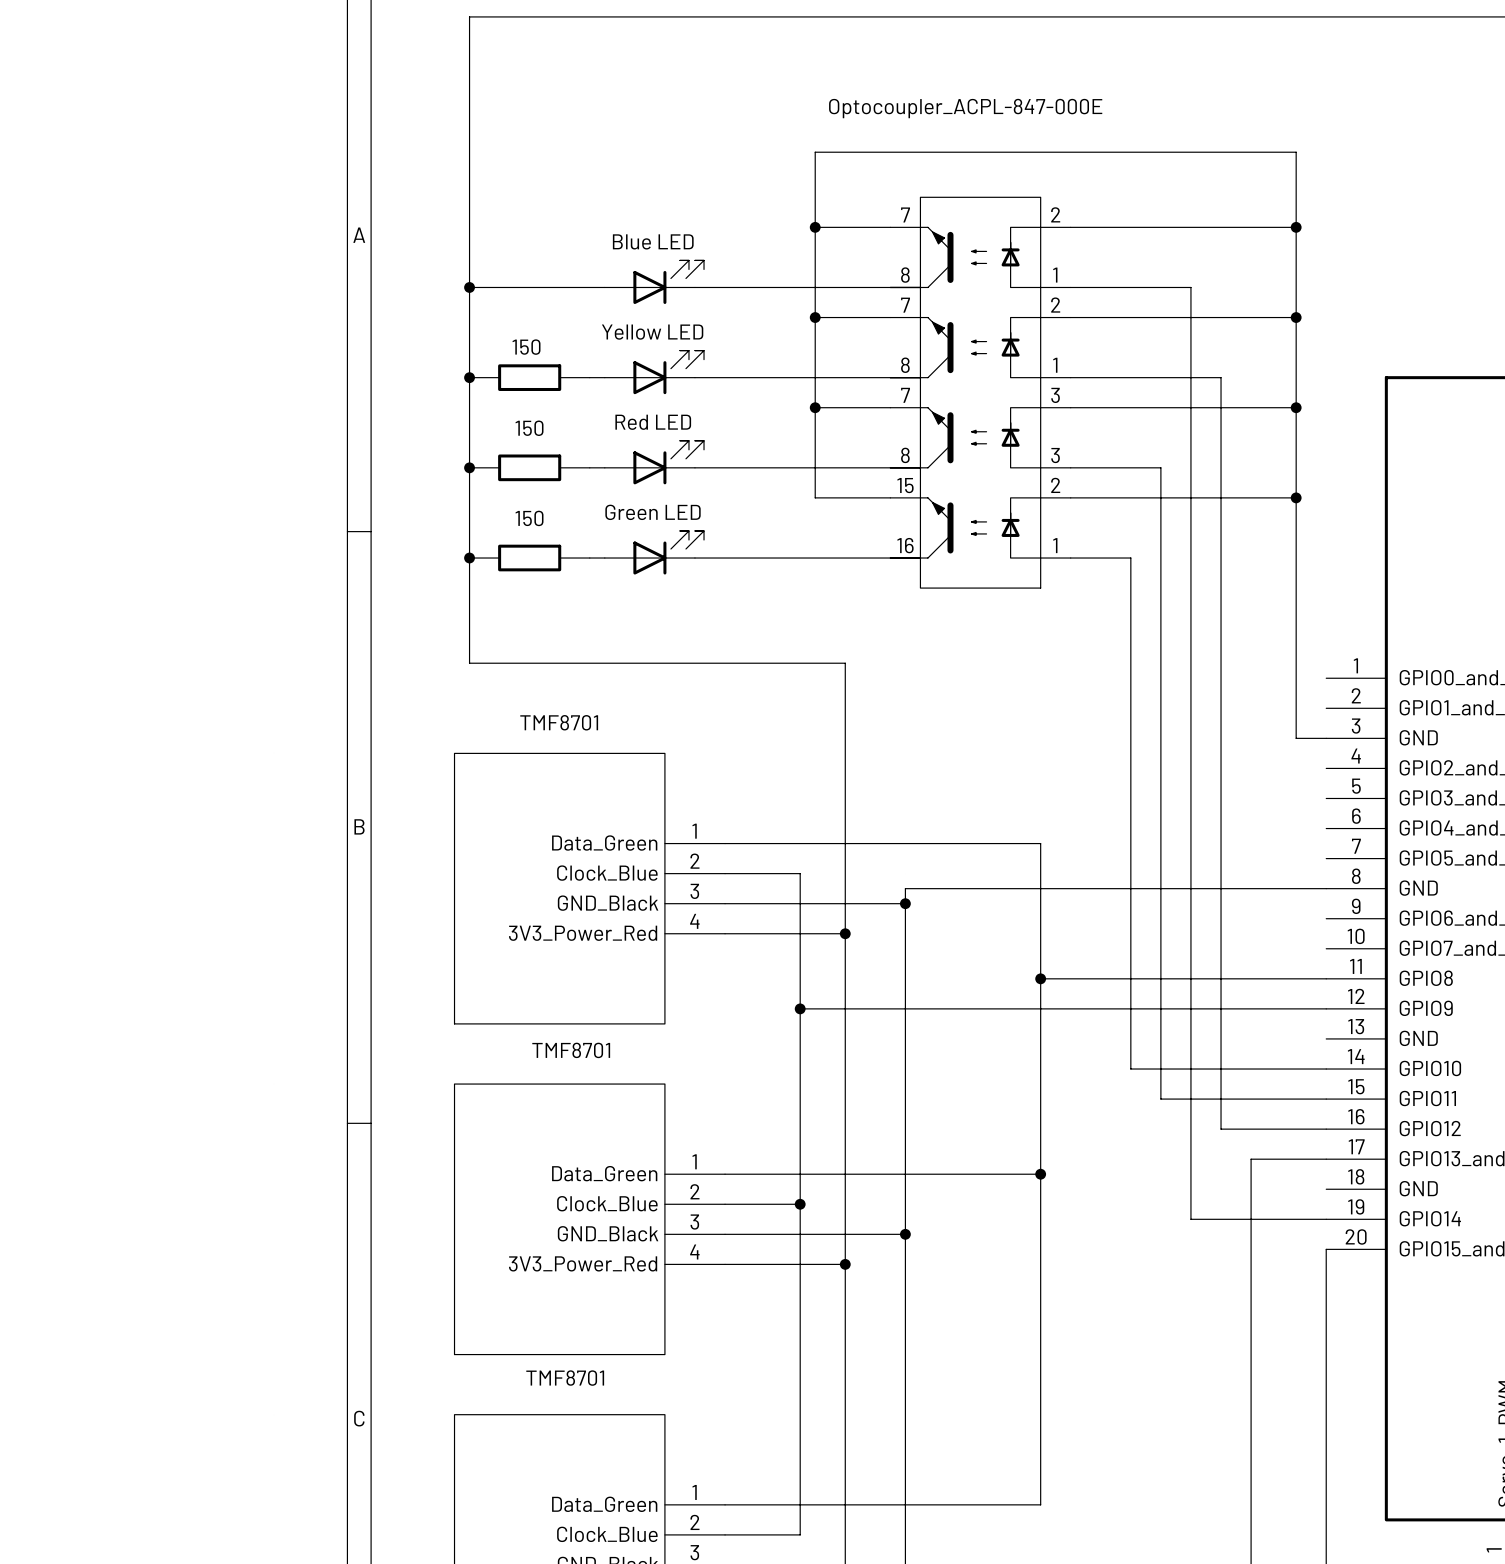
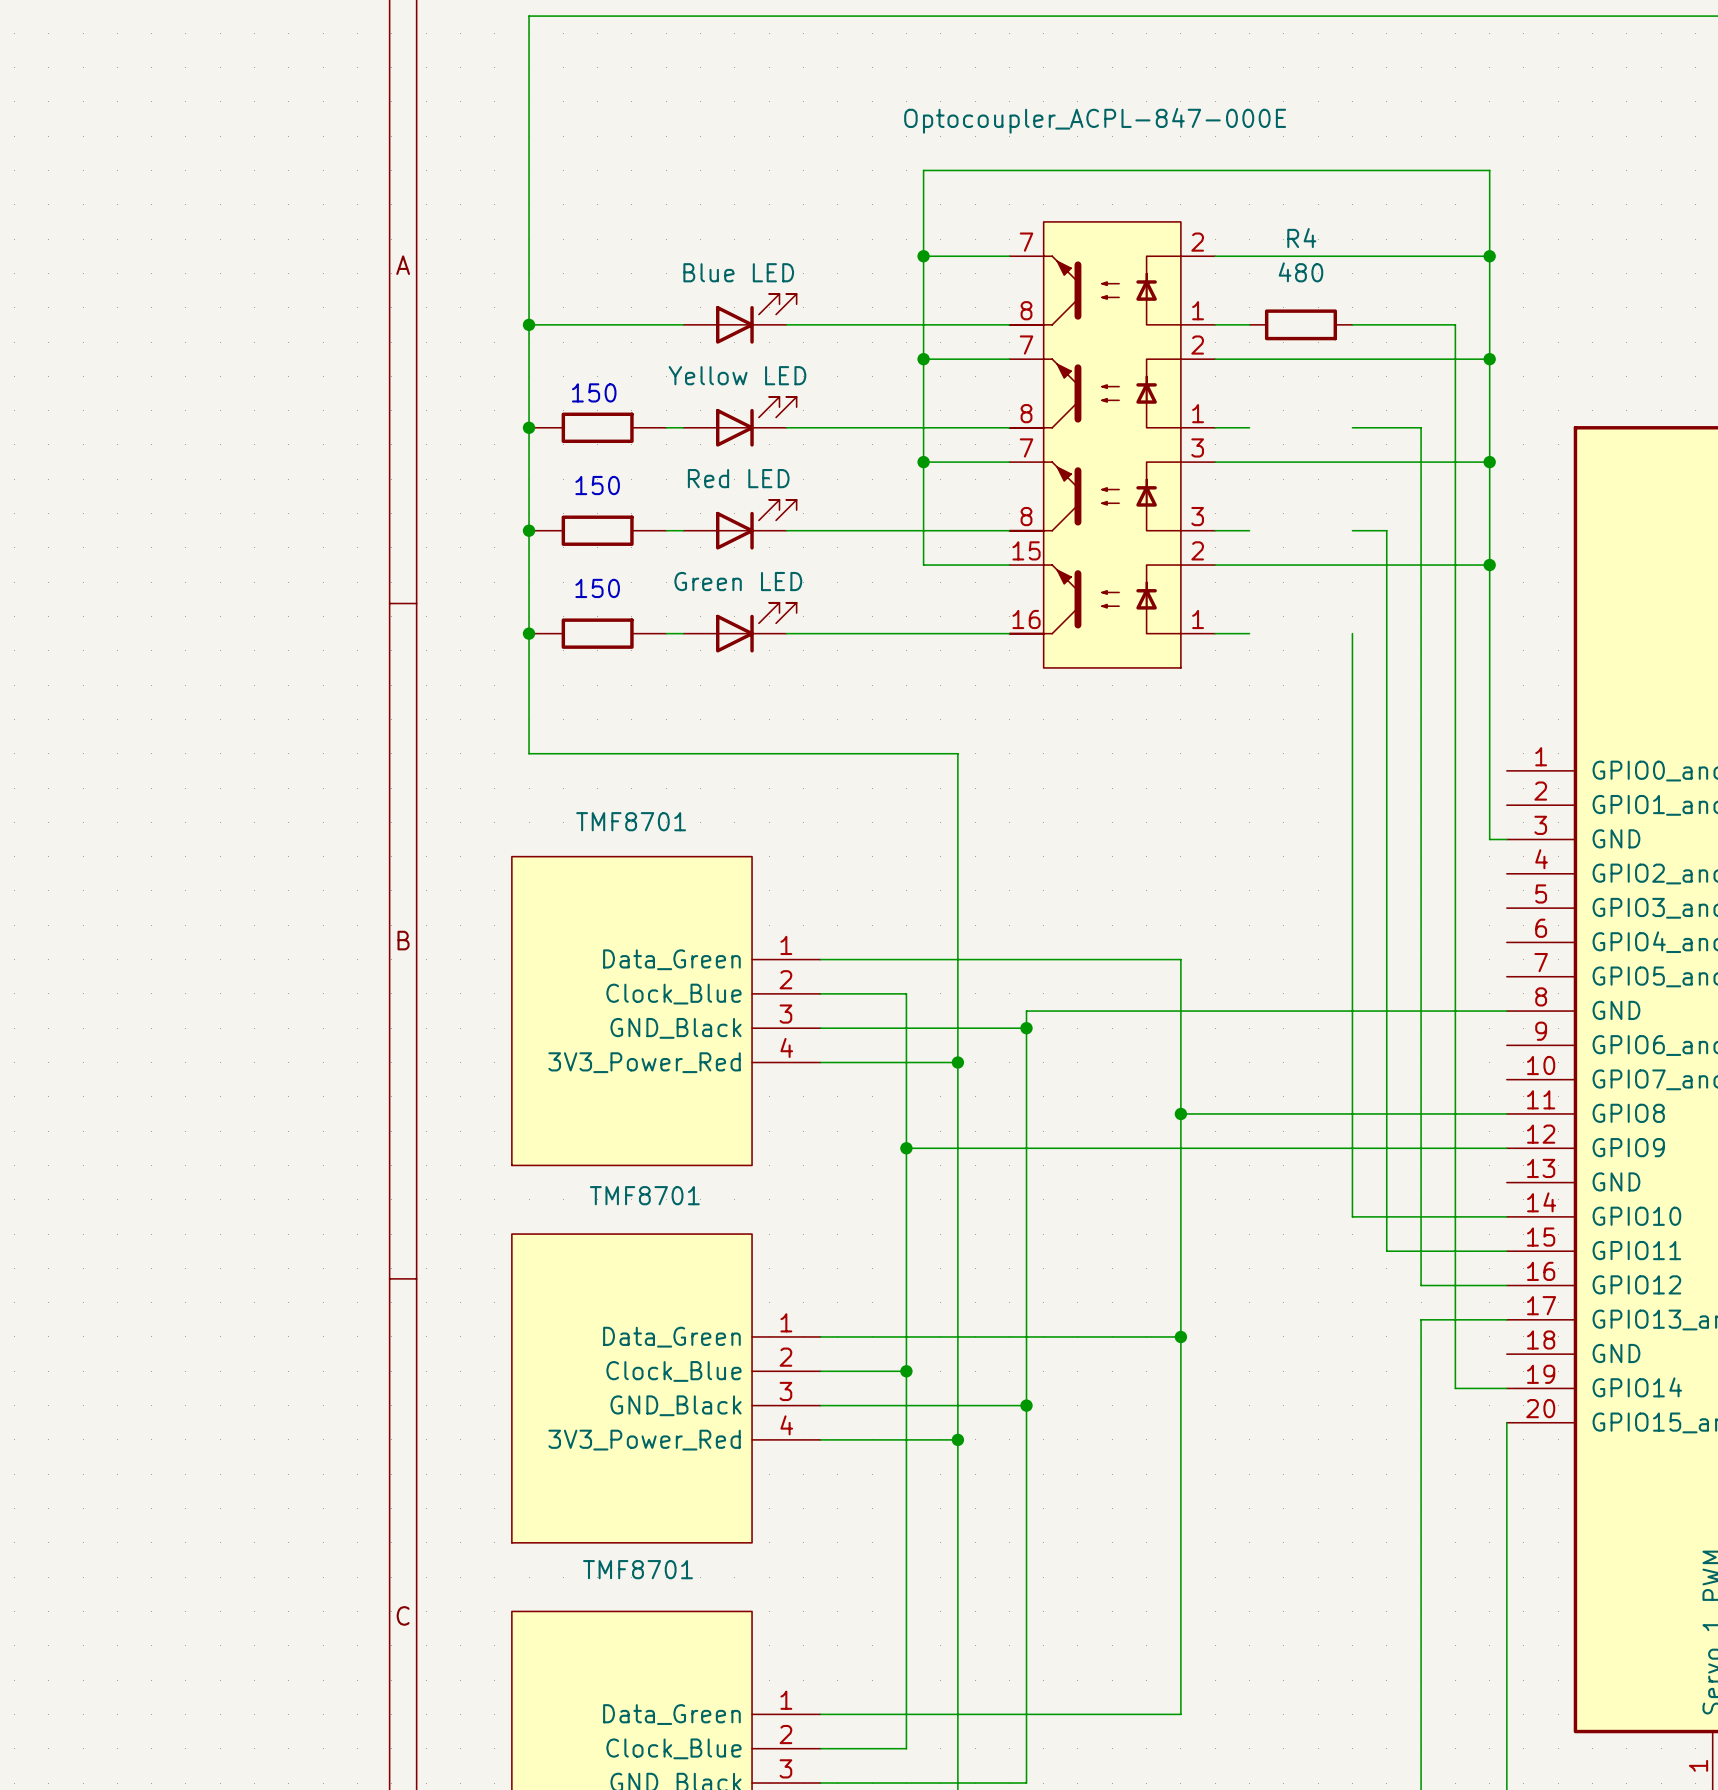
wire: (1296, 152) (1296, 738) (1311, 738) -> (1472, 170) (1489, 170) (1489, 839)
wire: none -> (1472, 256) (1489, 256)
junction position: (1296, 227) -> (1489, 256)
wire: (1100, 287) (1190, 287) (1190, 558) -> none
R4: none -> 480 (1300, 324)
wire: none -> (1472, 359) (1489, 359)
junction position: (1296, 317) -> (1489, 359)
wire: (1100, 377) (1190, 377) -> none
wire: (1221, 377) (1221, 467) -> (1352, 530) (1386, 530)
wire: none -> (1472, 462) (1489, 462)
junction position: (1296, 407) -> (1489, 462)
wire: (1100, 467) (1160, 467) (1160, 1099) (1221, 1099) (1221, 1129) (1251, 1129) -> (1386, 427) (1421, 427) (1421, 1285)
wire: none -> (1472, 565) (1489, 565)
junction position: (1296, 497) -> (1489, 565)
wire: (1100, 558) (1130, 558) (1130, 1069) (1190, 1069) (1190, 1219) (1281, 1219) -> (1352, 324) (1455, 324) (1455, 1388)

